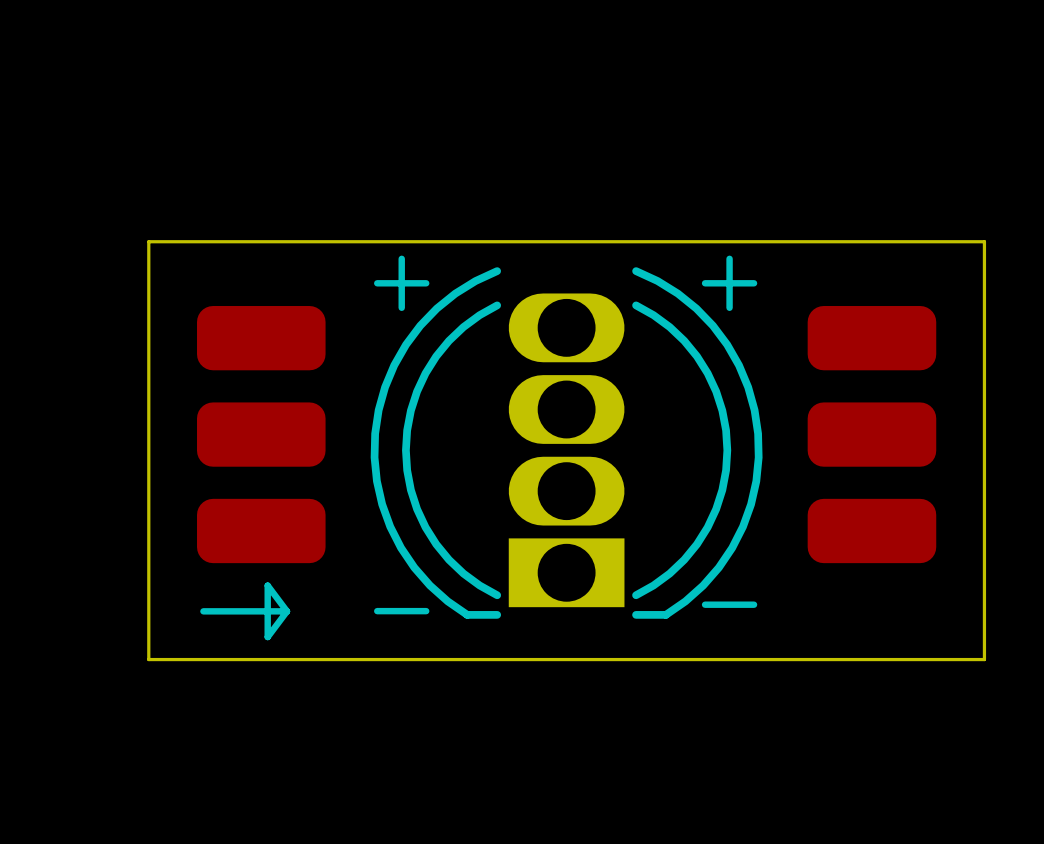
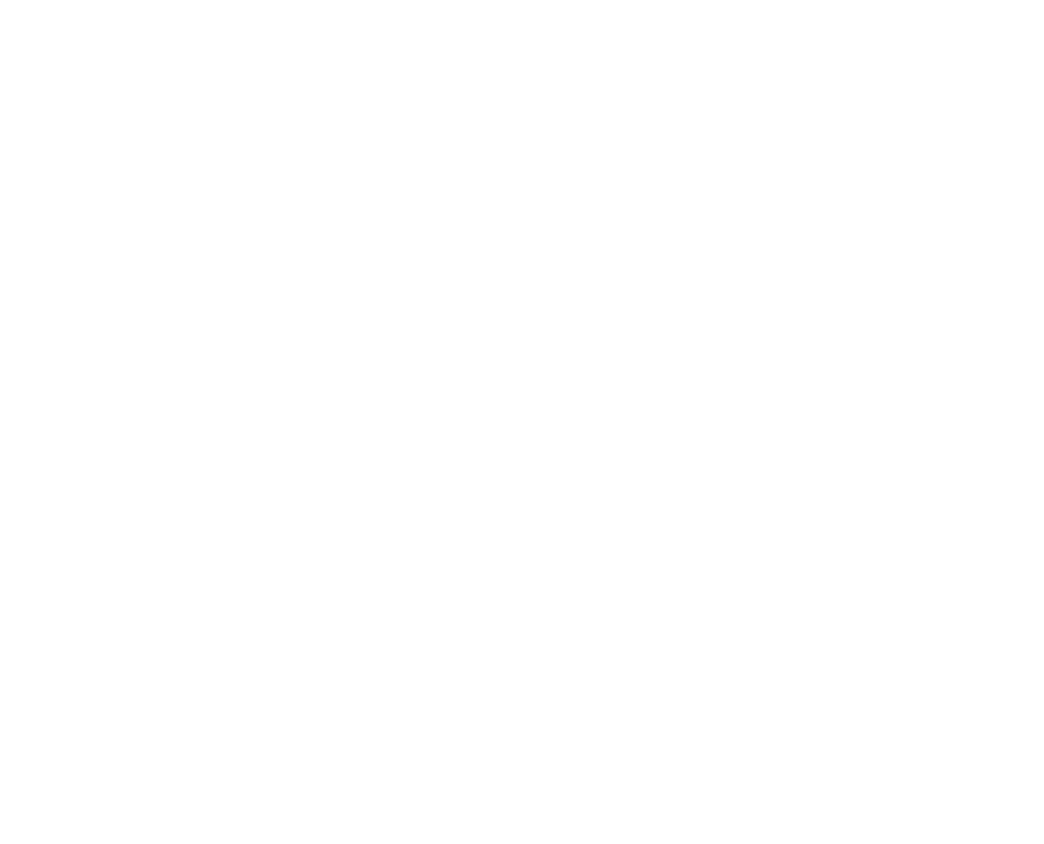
board edge: (148, 241) (984, 241) (984, 659) (148, 659) (148, 241) -> none
text: + (401, 283) -> none
text: + (729, 283) -> none
part: (261, 338) -> none
part: (871, 338) -> none
part: (261, 434) -> none
part: (871, 434) -> none
part: (566, 443) -> none
part: (261, 530) -> none
part: (871, 530) -> none
text: - (729, 604) -> none
line: (203, 611) (286, 611) -> none
line: (286, 611) (267, 585) (267, 637) (286, 611) -> none
text: - (401, 611) -> none

